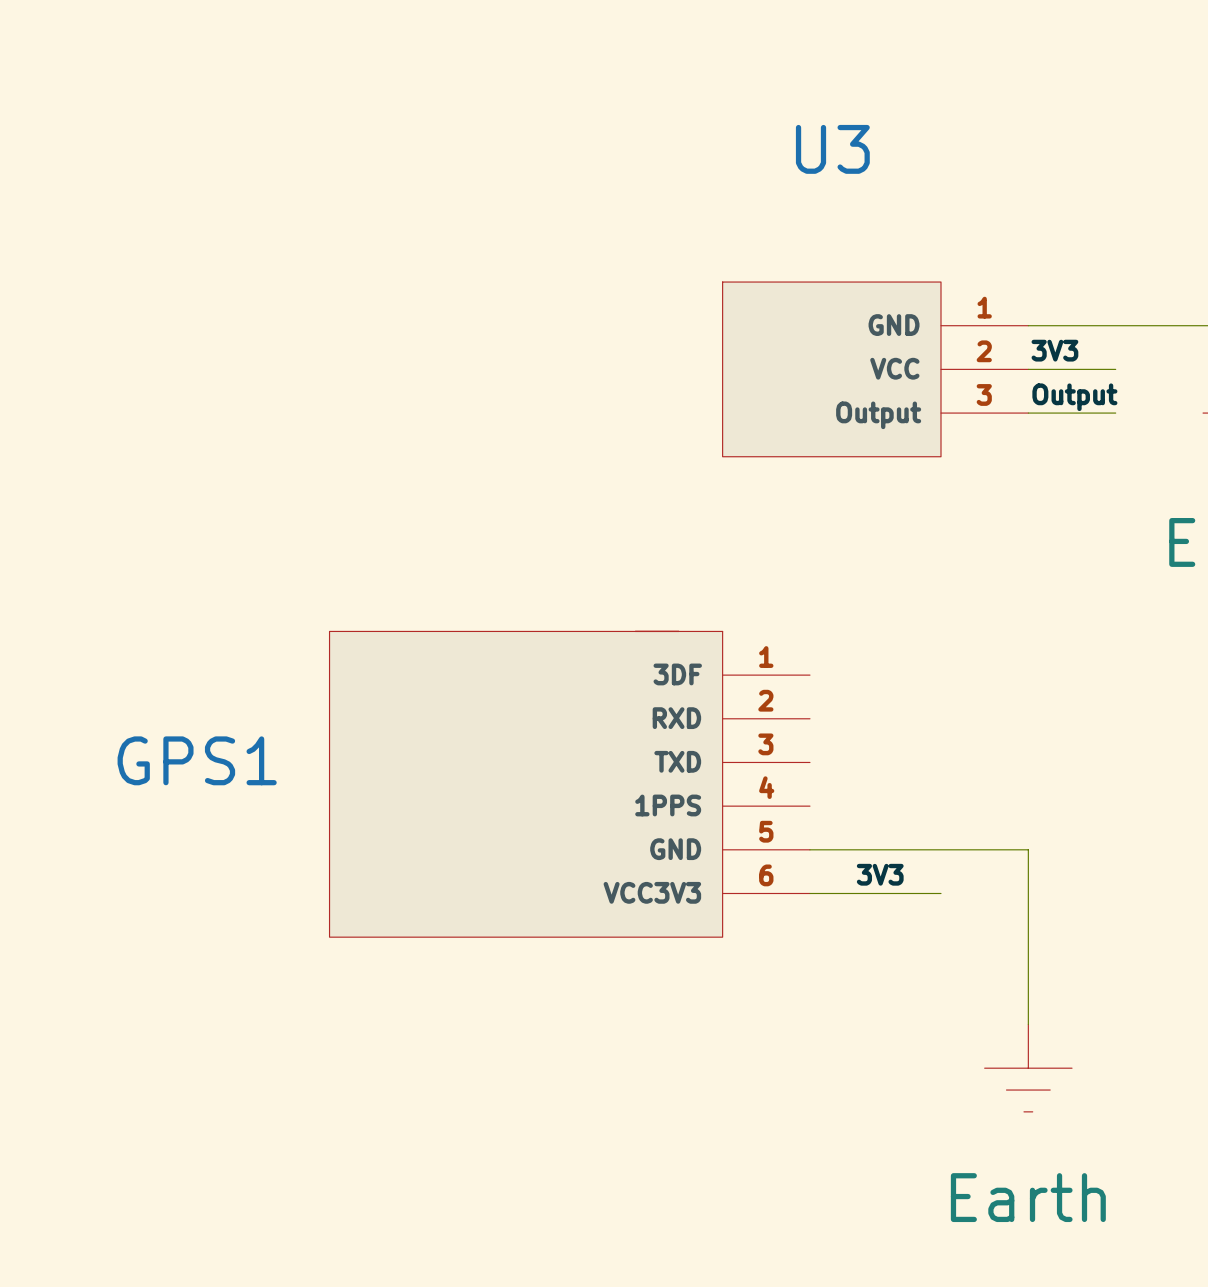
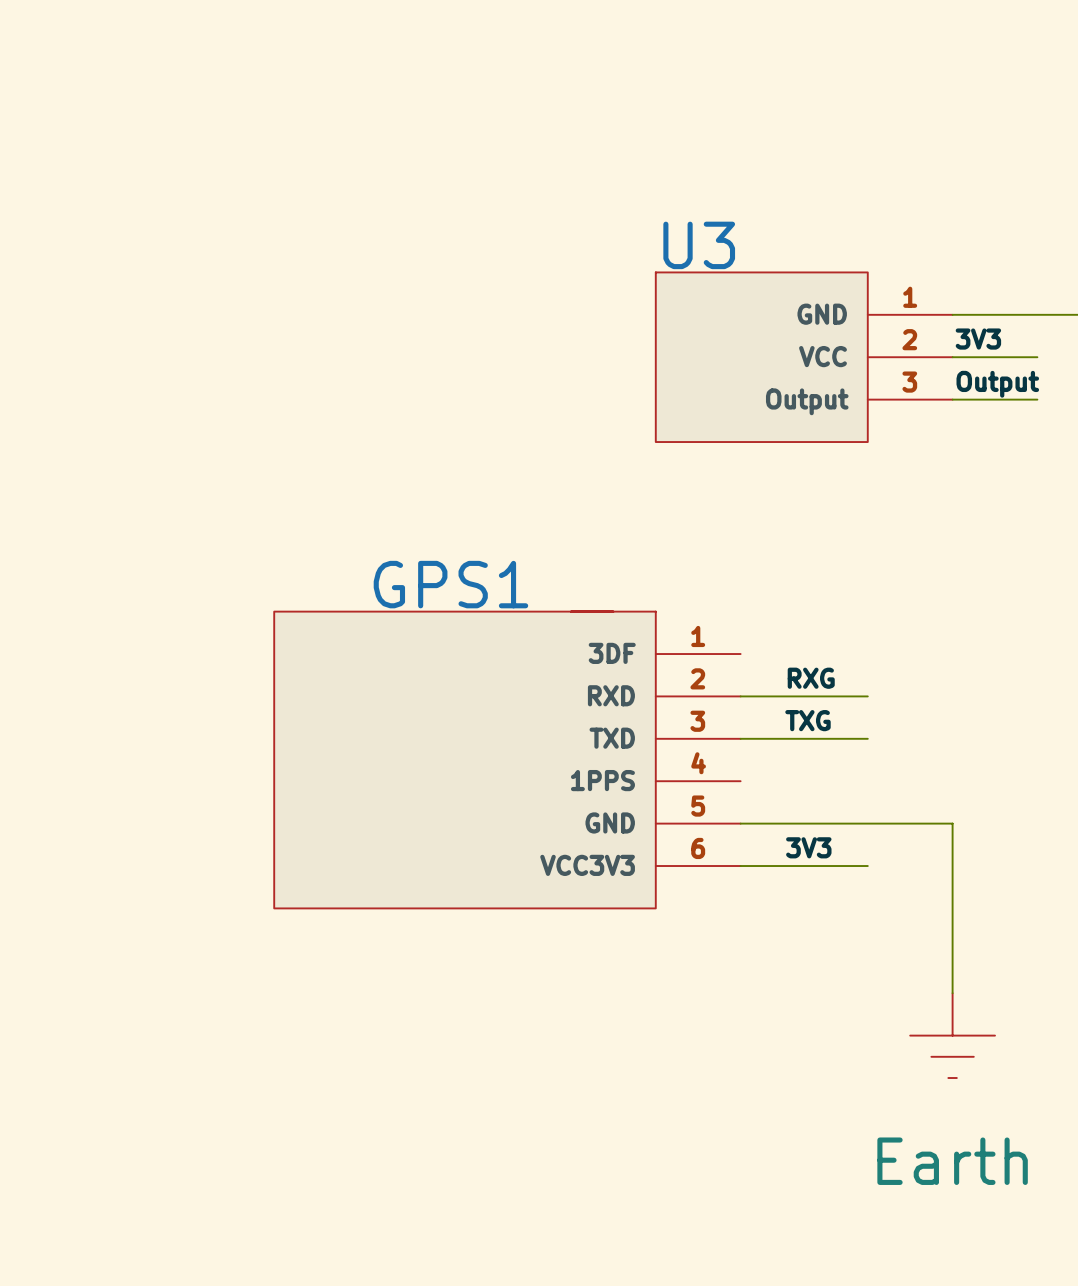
U3 name position: U3 (832, 149) -> U3 (699, 245)
label: none -> RXG (811, 678)
wire: none -> (740, 696) (867, 696)
label: none -> TXG (807, 720)
GPS1 name position: GPS1 (197, 760) -> GPS1 (450, 584)
wire: none -> (740, 738) (867, 738)

